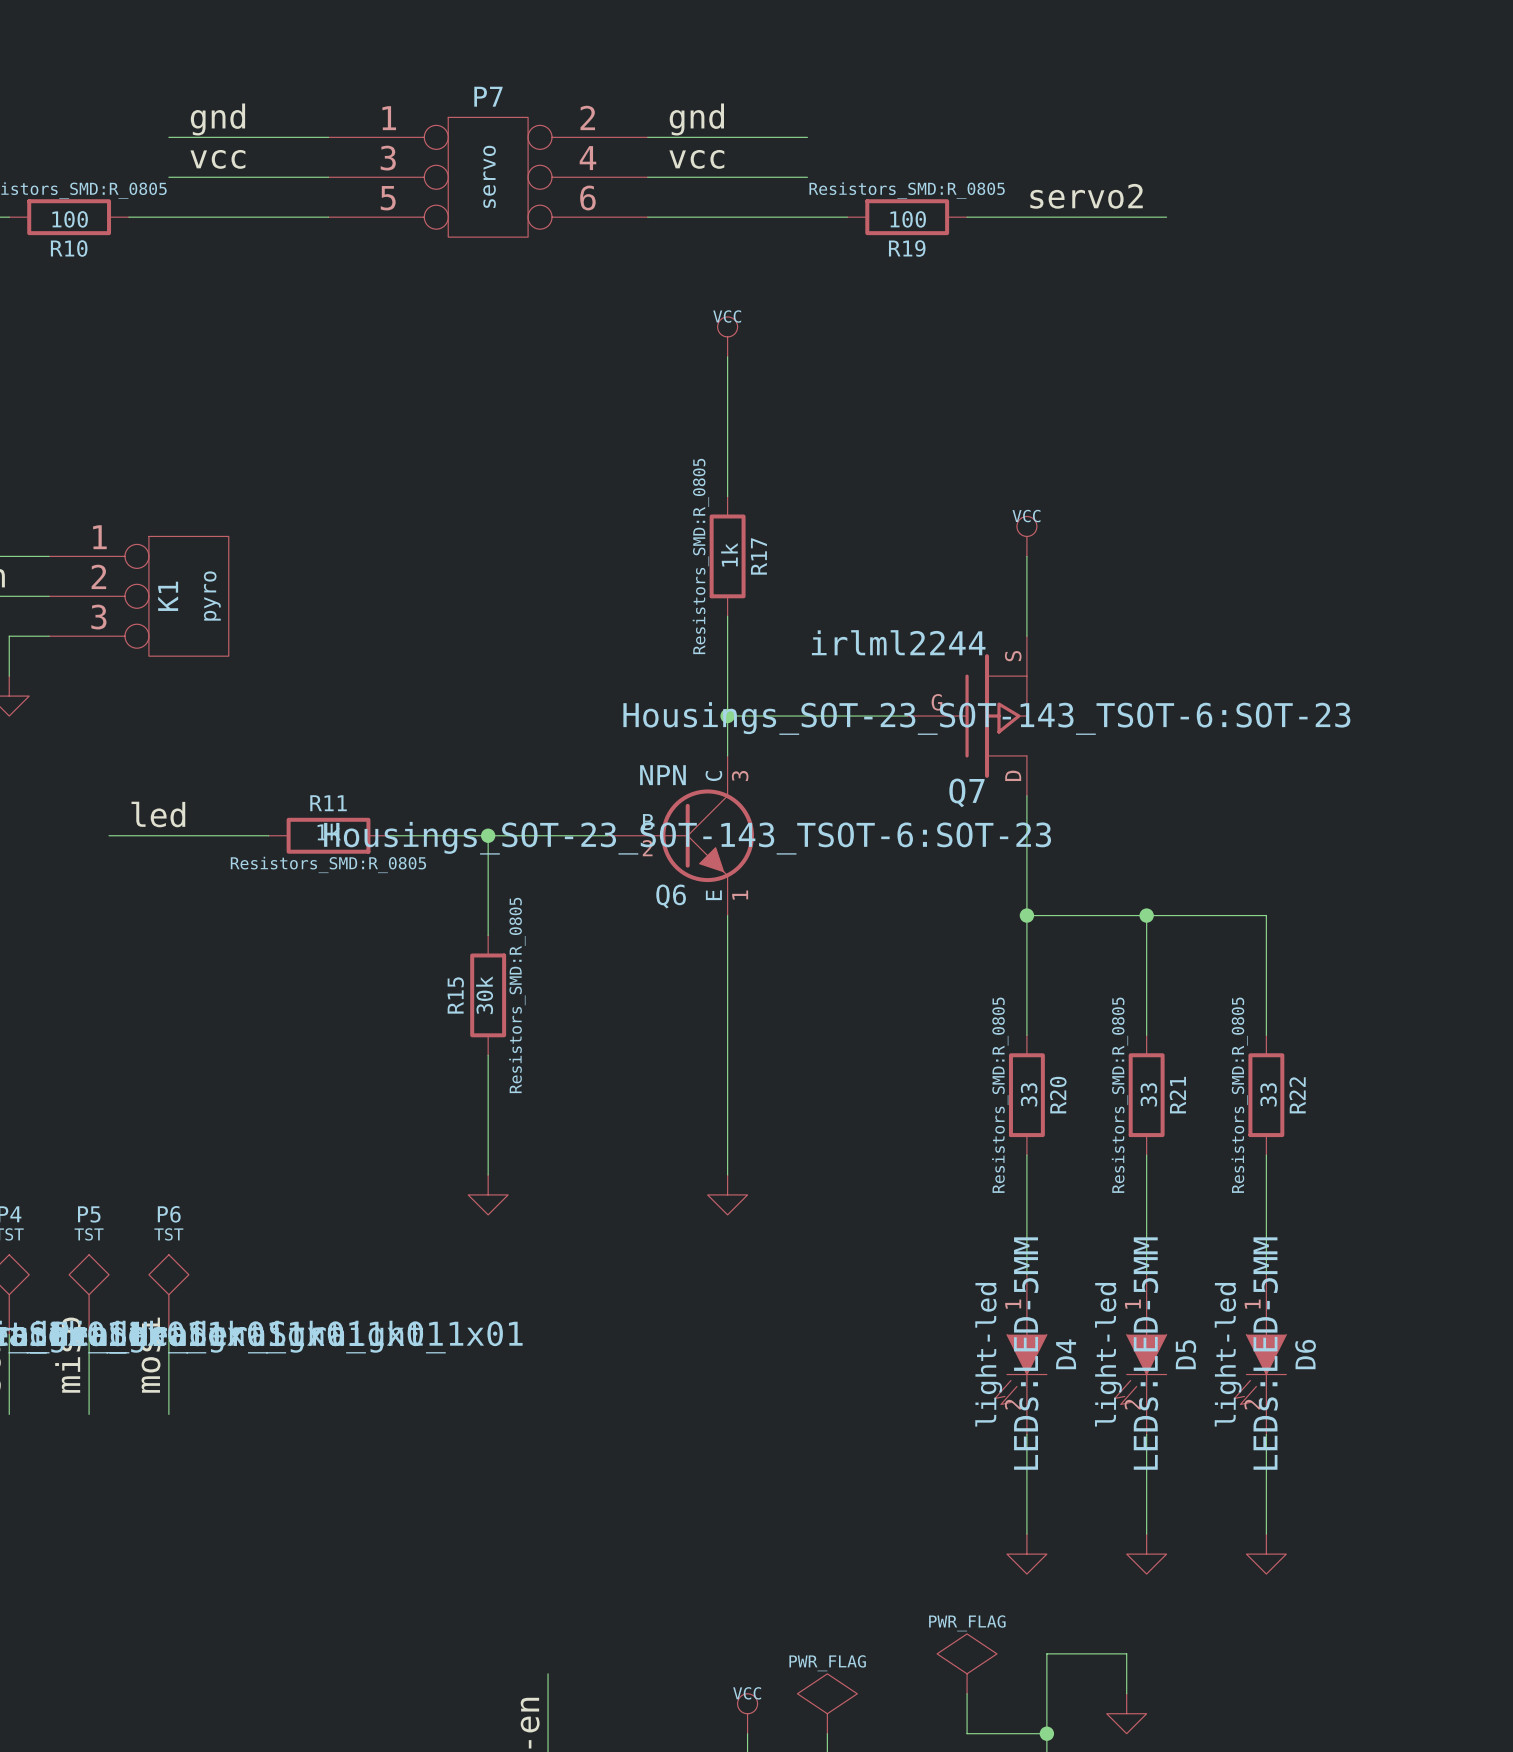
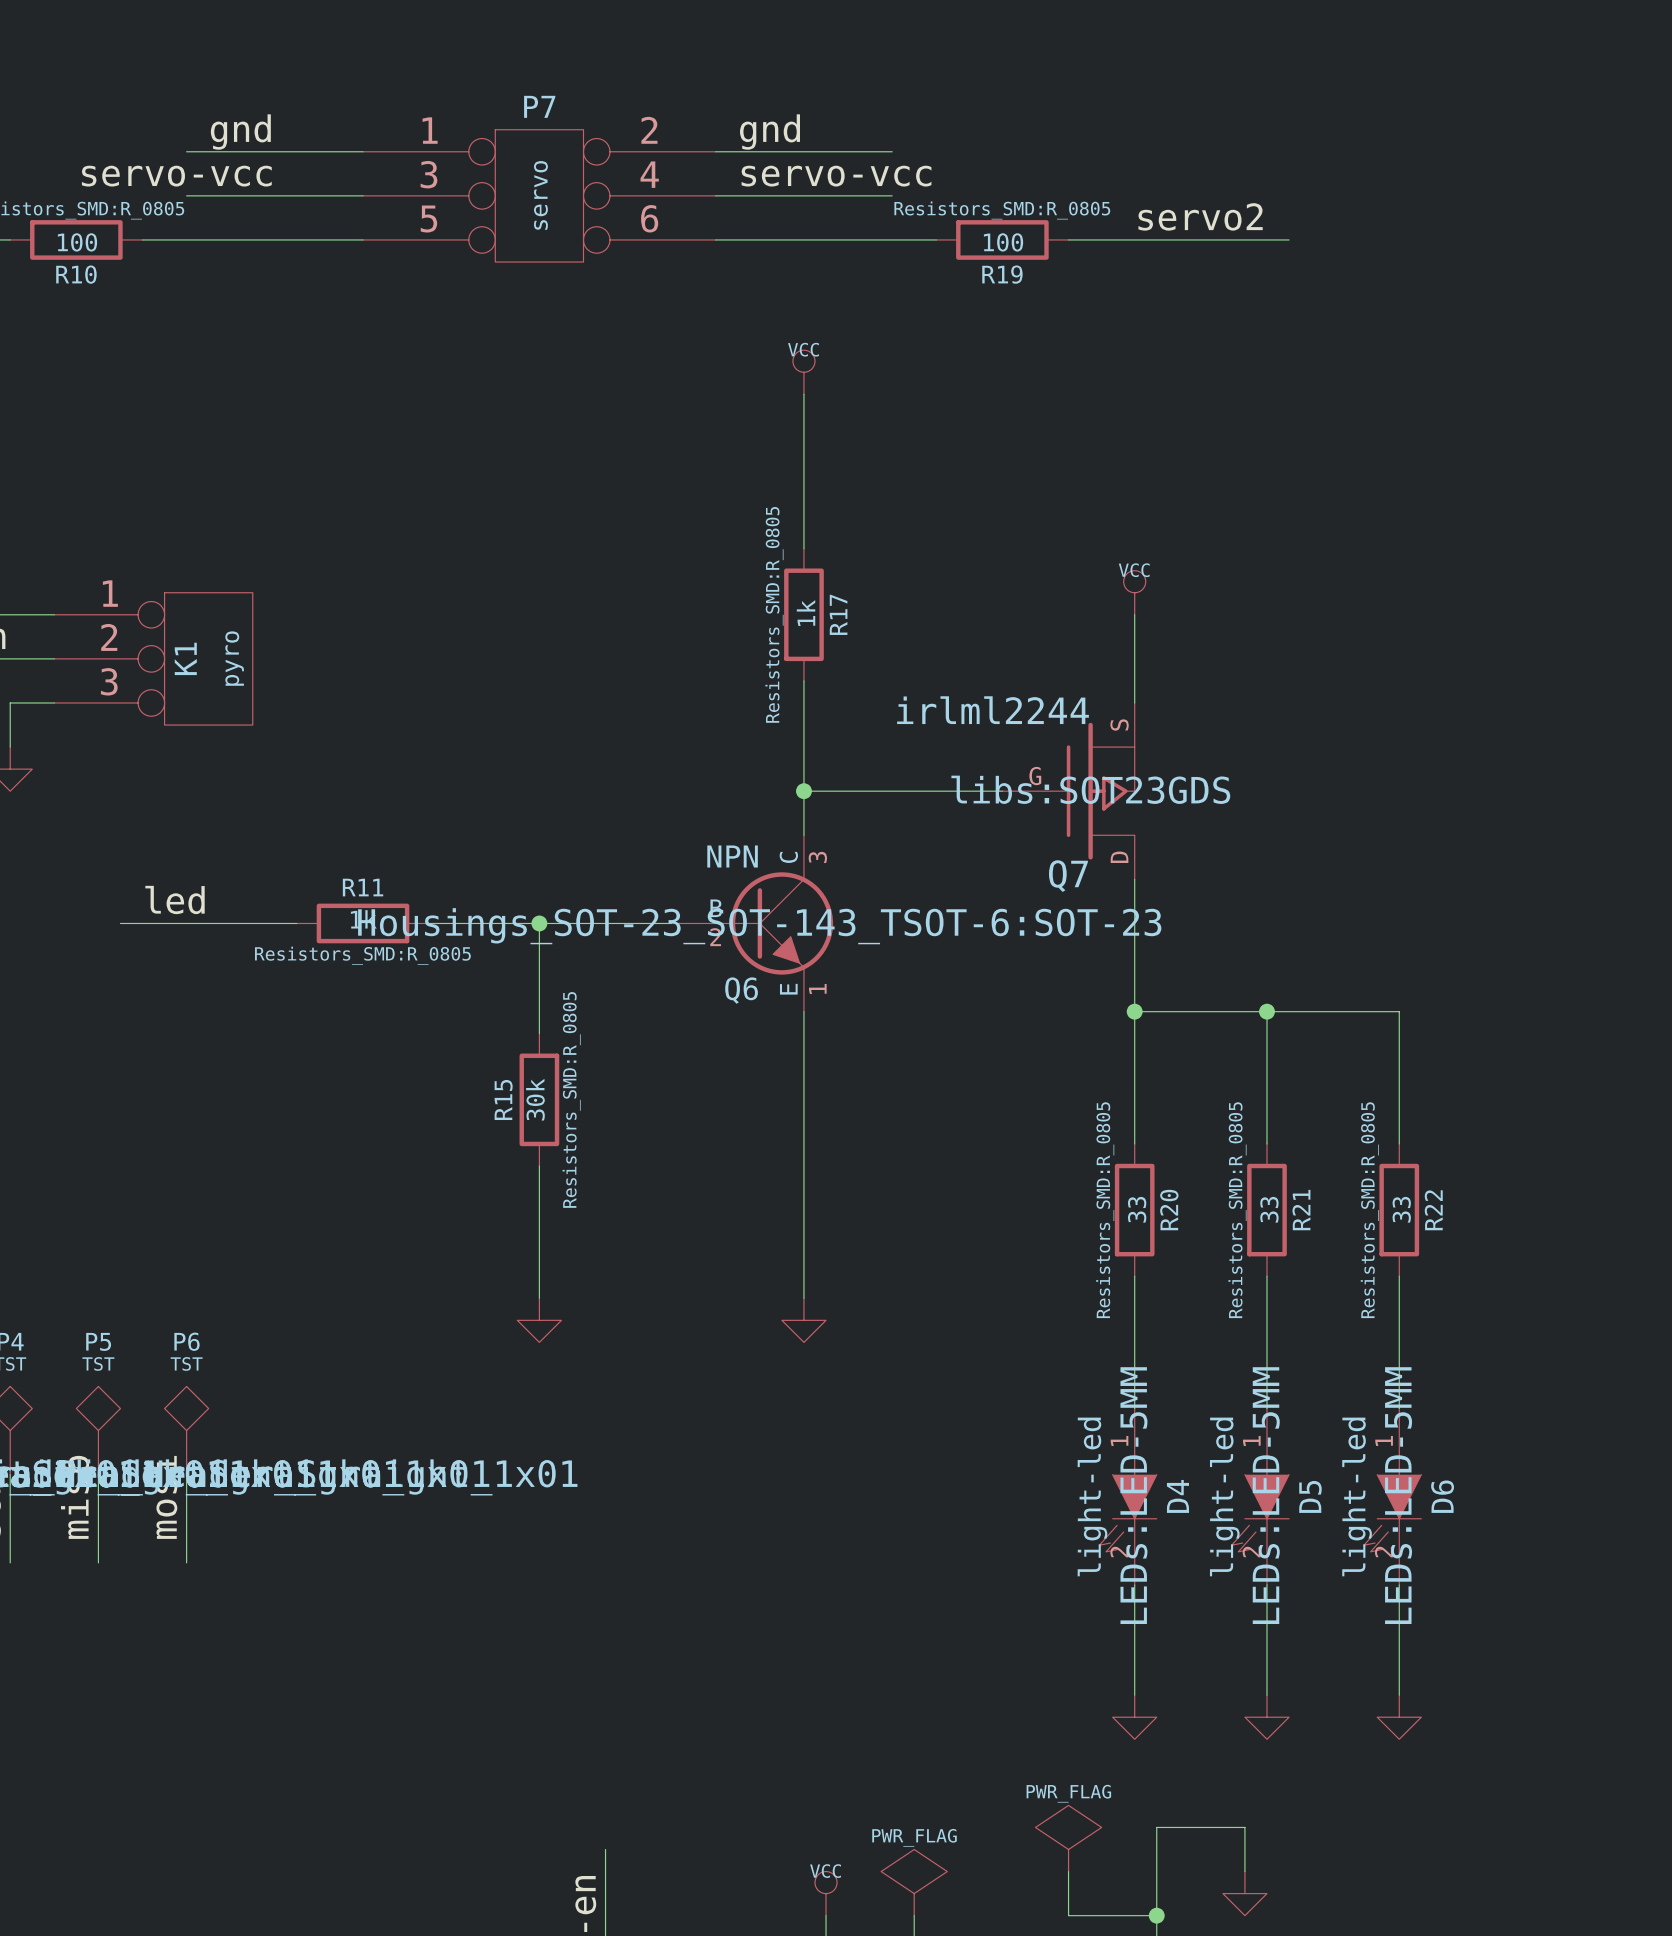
label: none -> servo-vcc (176, 176)
label: vcc (217, 159) -> none
label: vcc (696, 159) -> servo-vcc (836, 176)
Q7 text: Housings_SOT-23_SOT-143_TSOT-6:SOT-23 (986, 718) -> libs:SOT23GDS (1090, 789)

